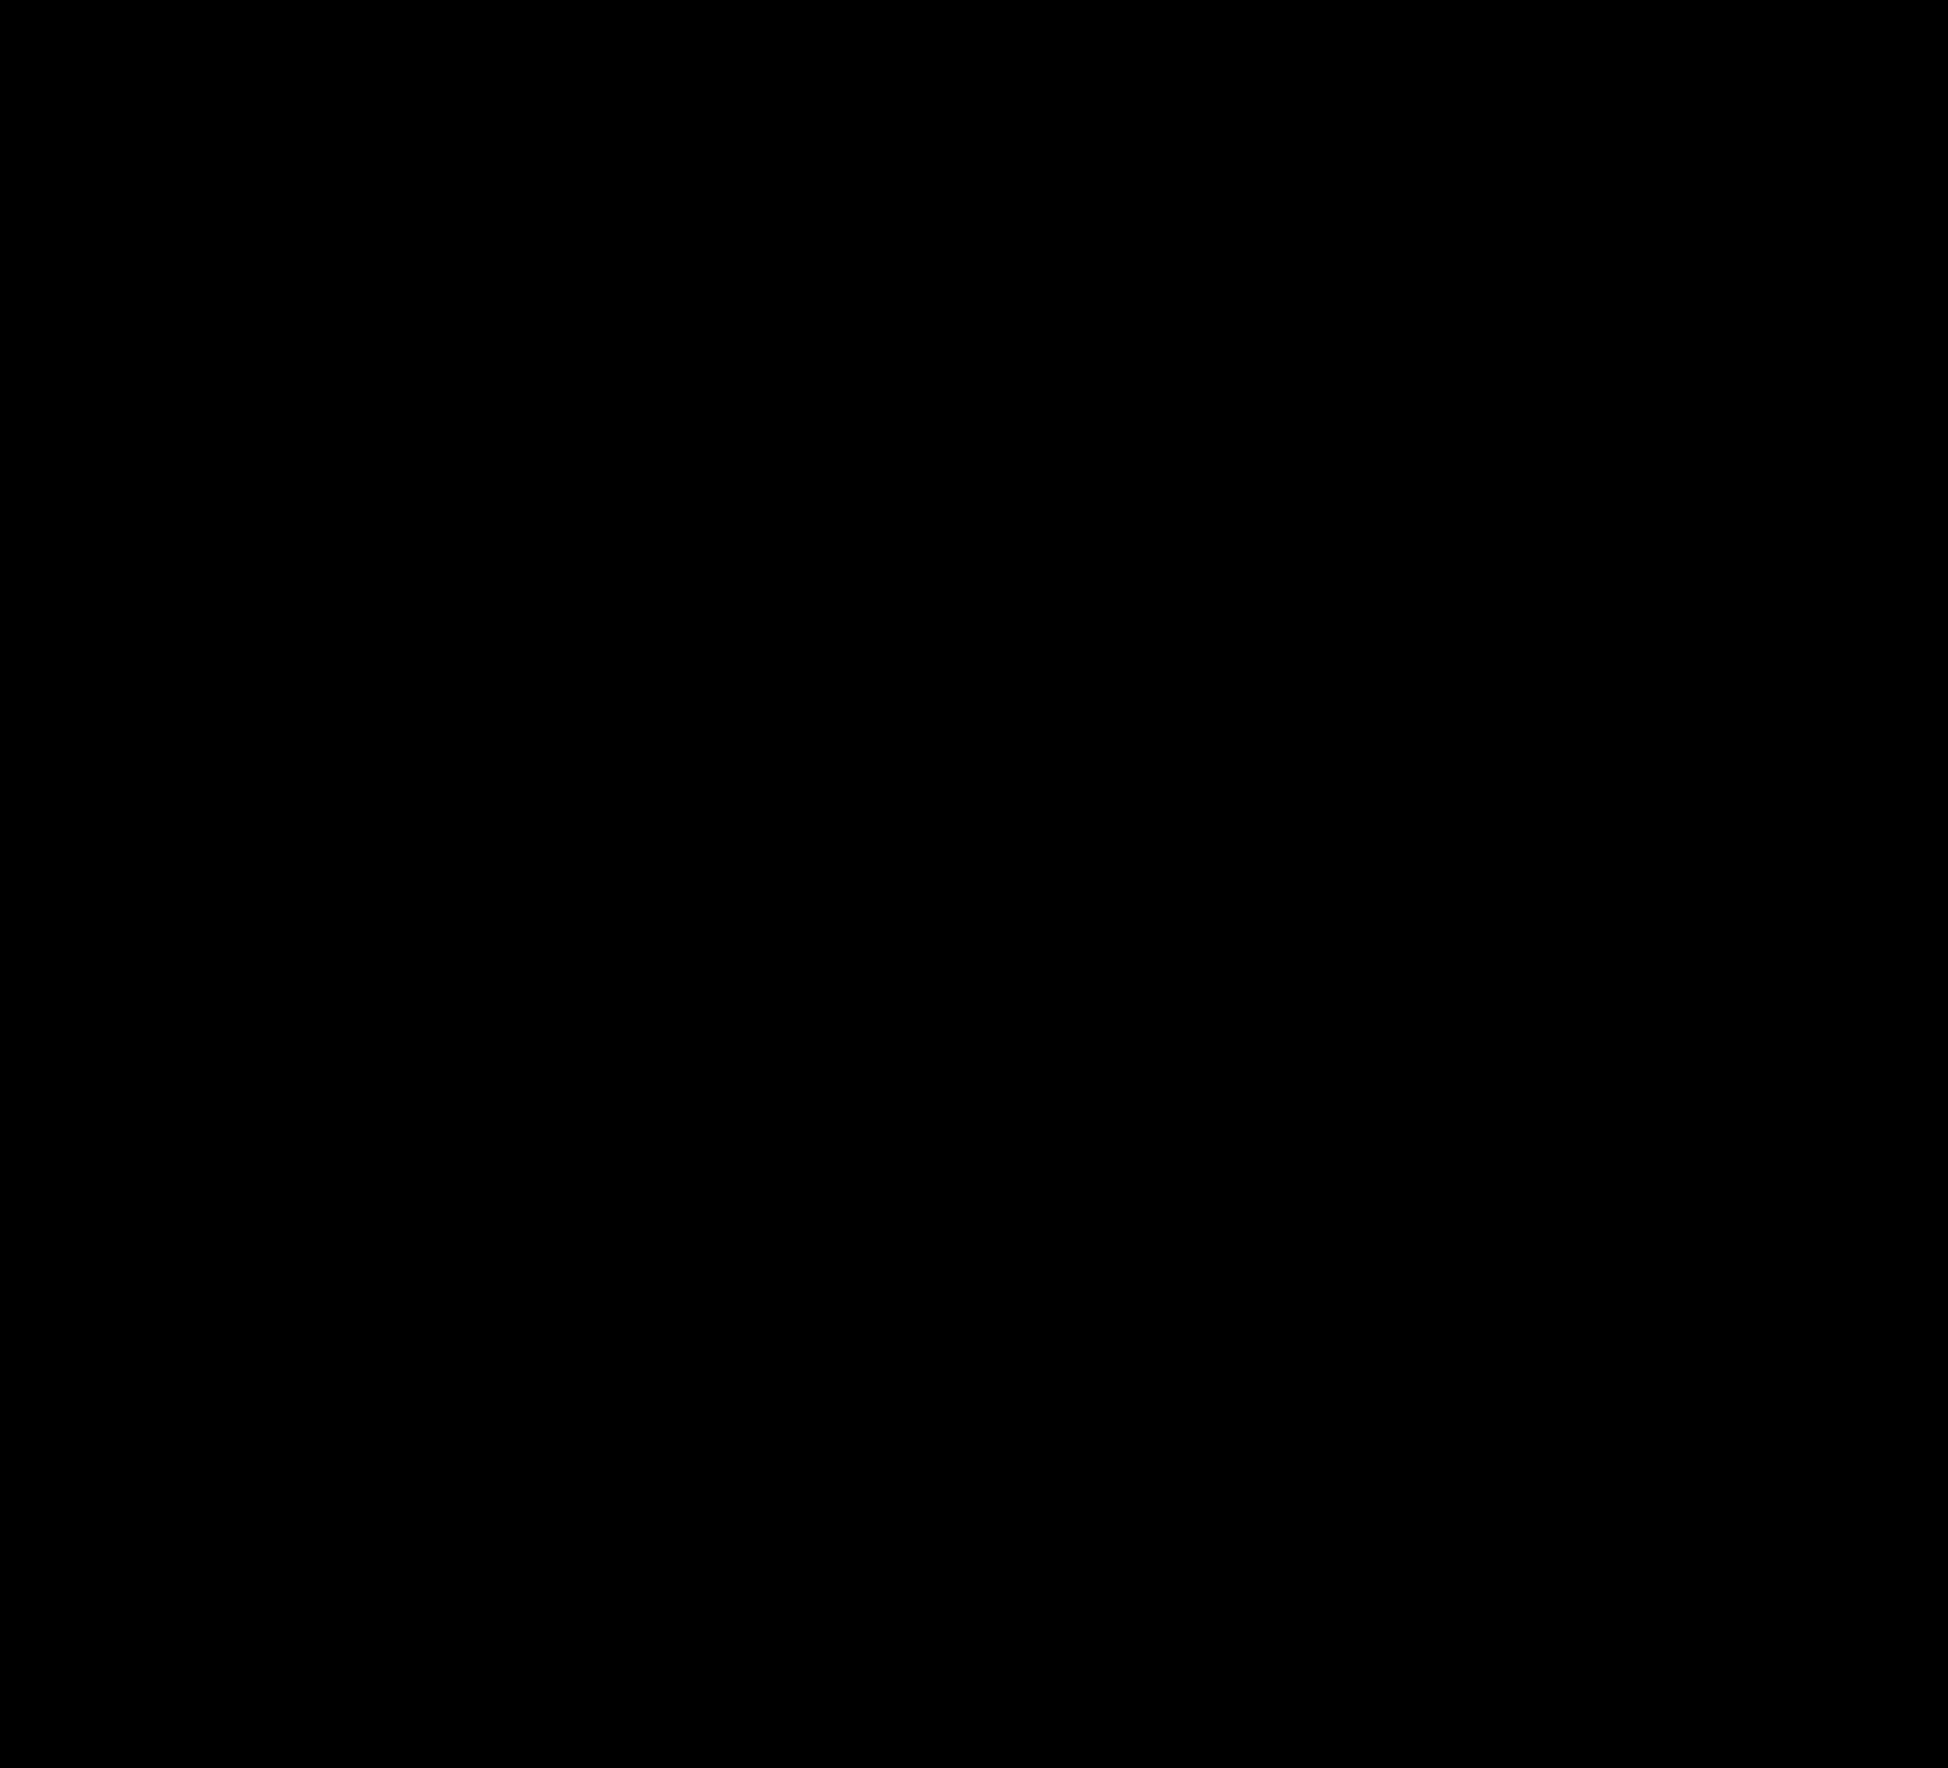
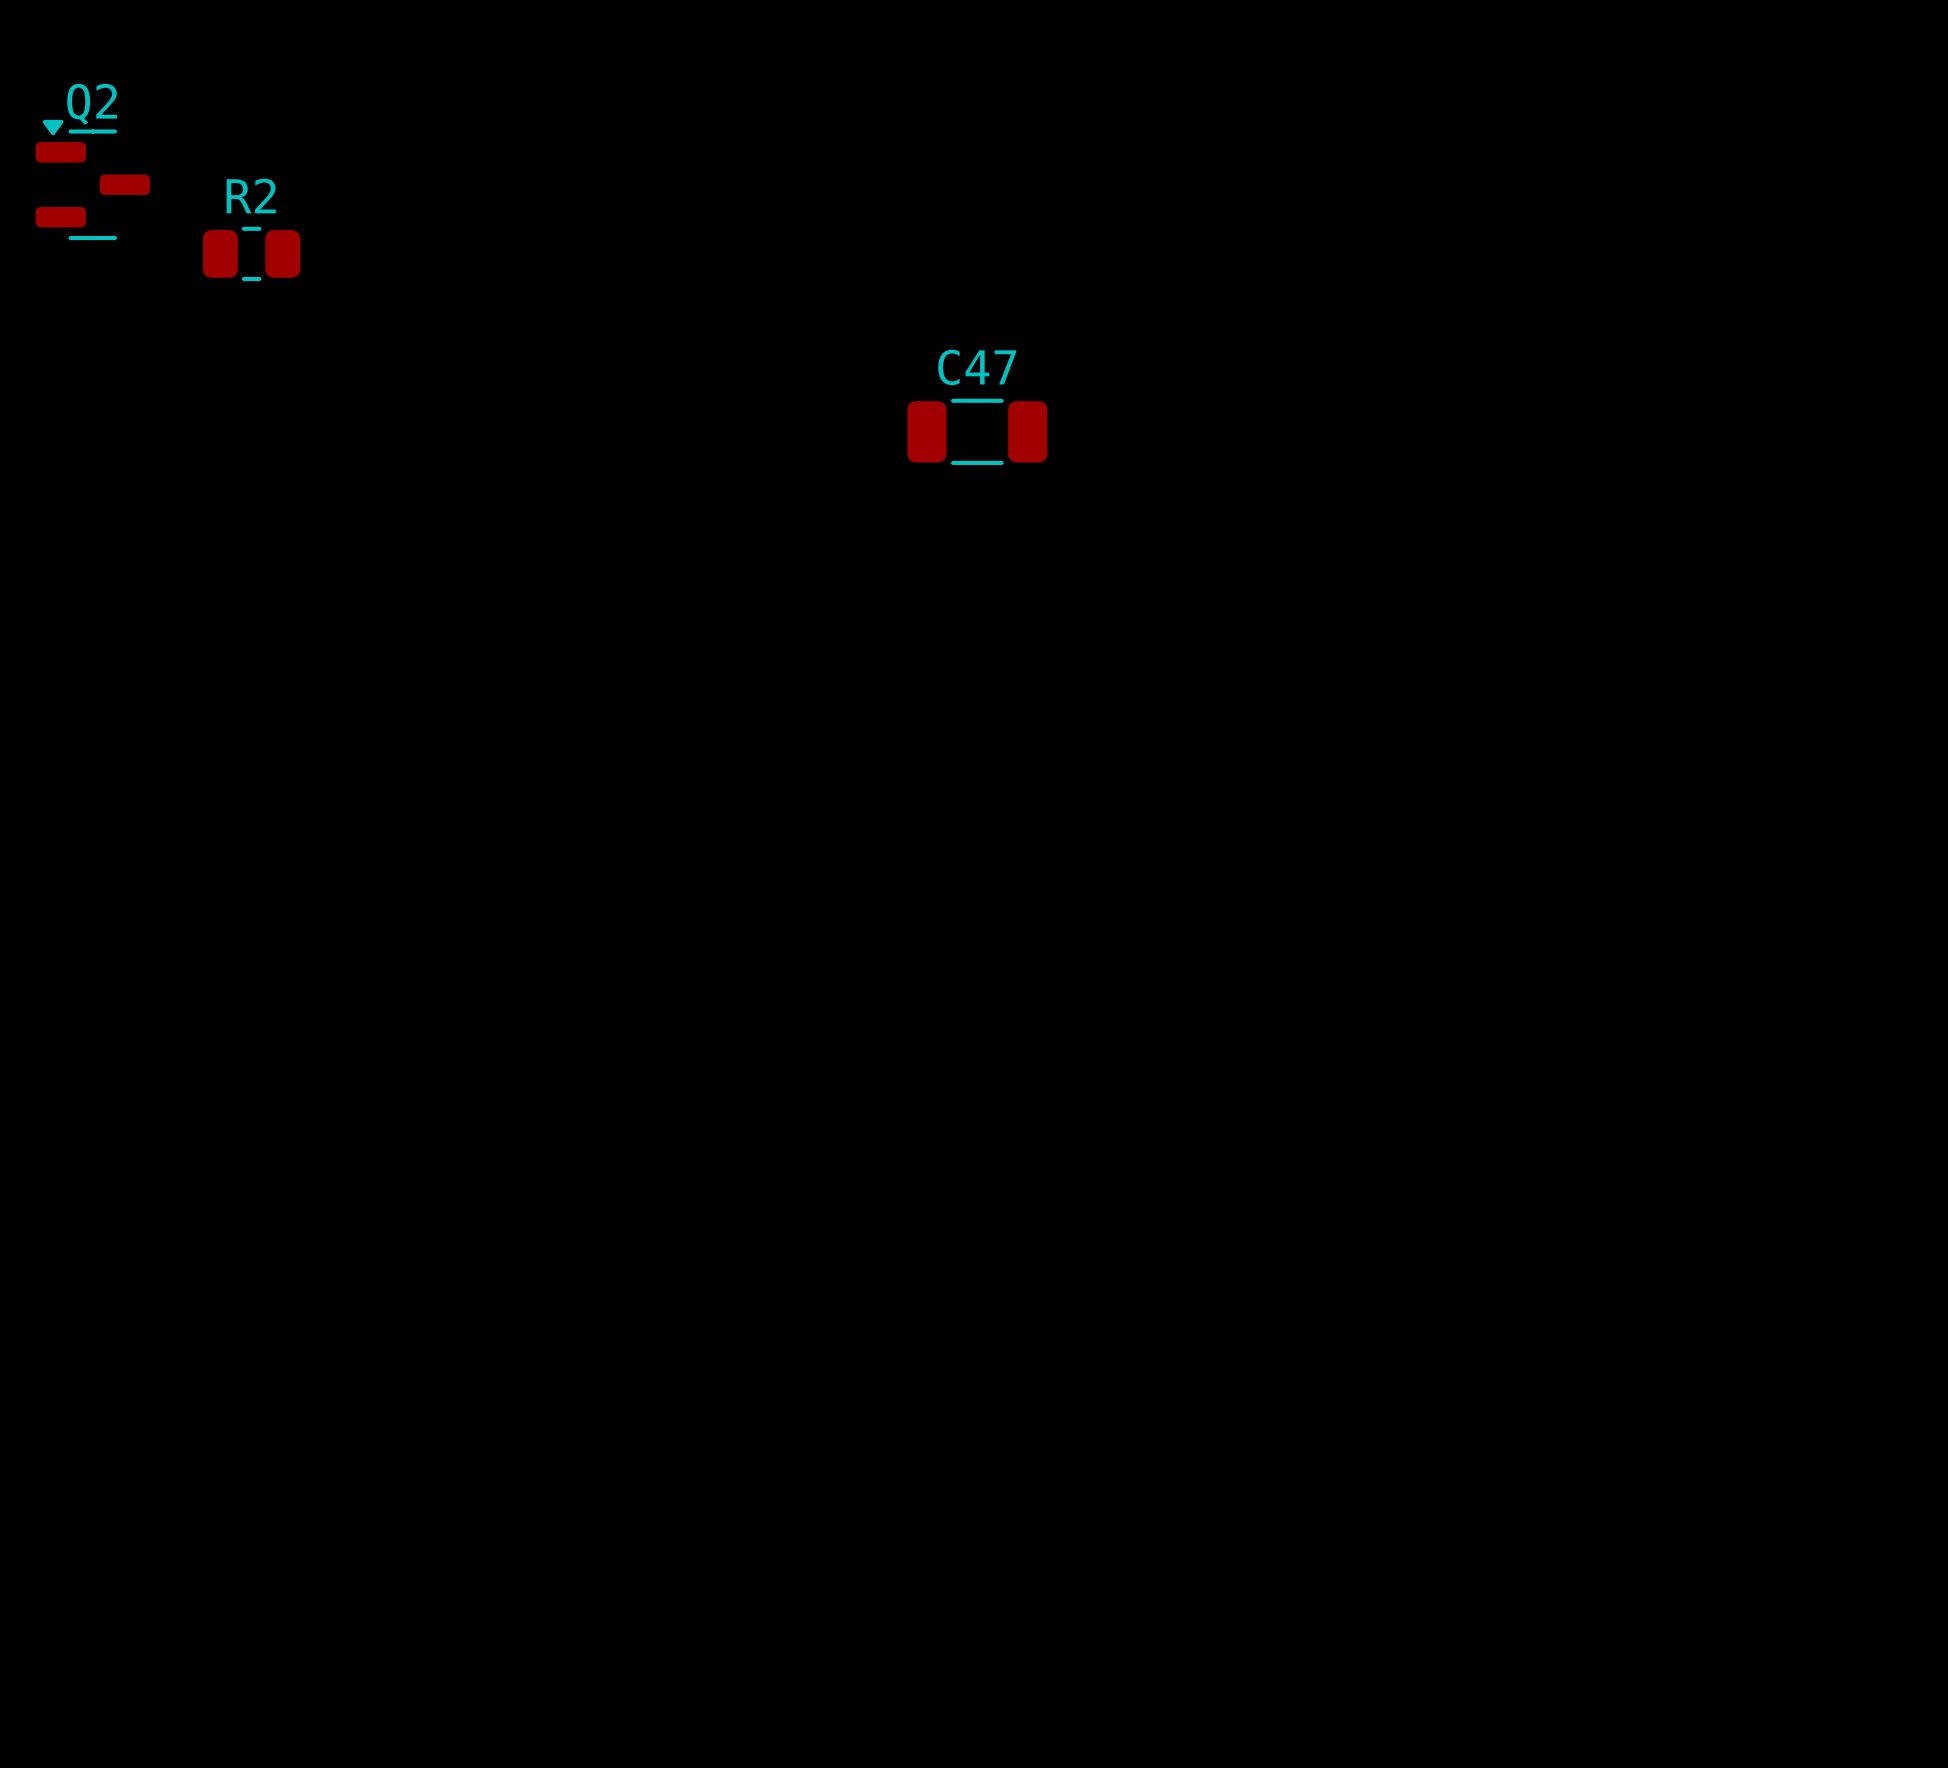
Q2: none -> (92, 179)
R2: none -> (251, 253)
C47: none -> (977, 431)

